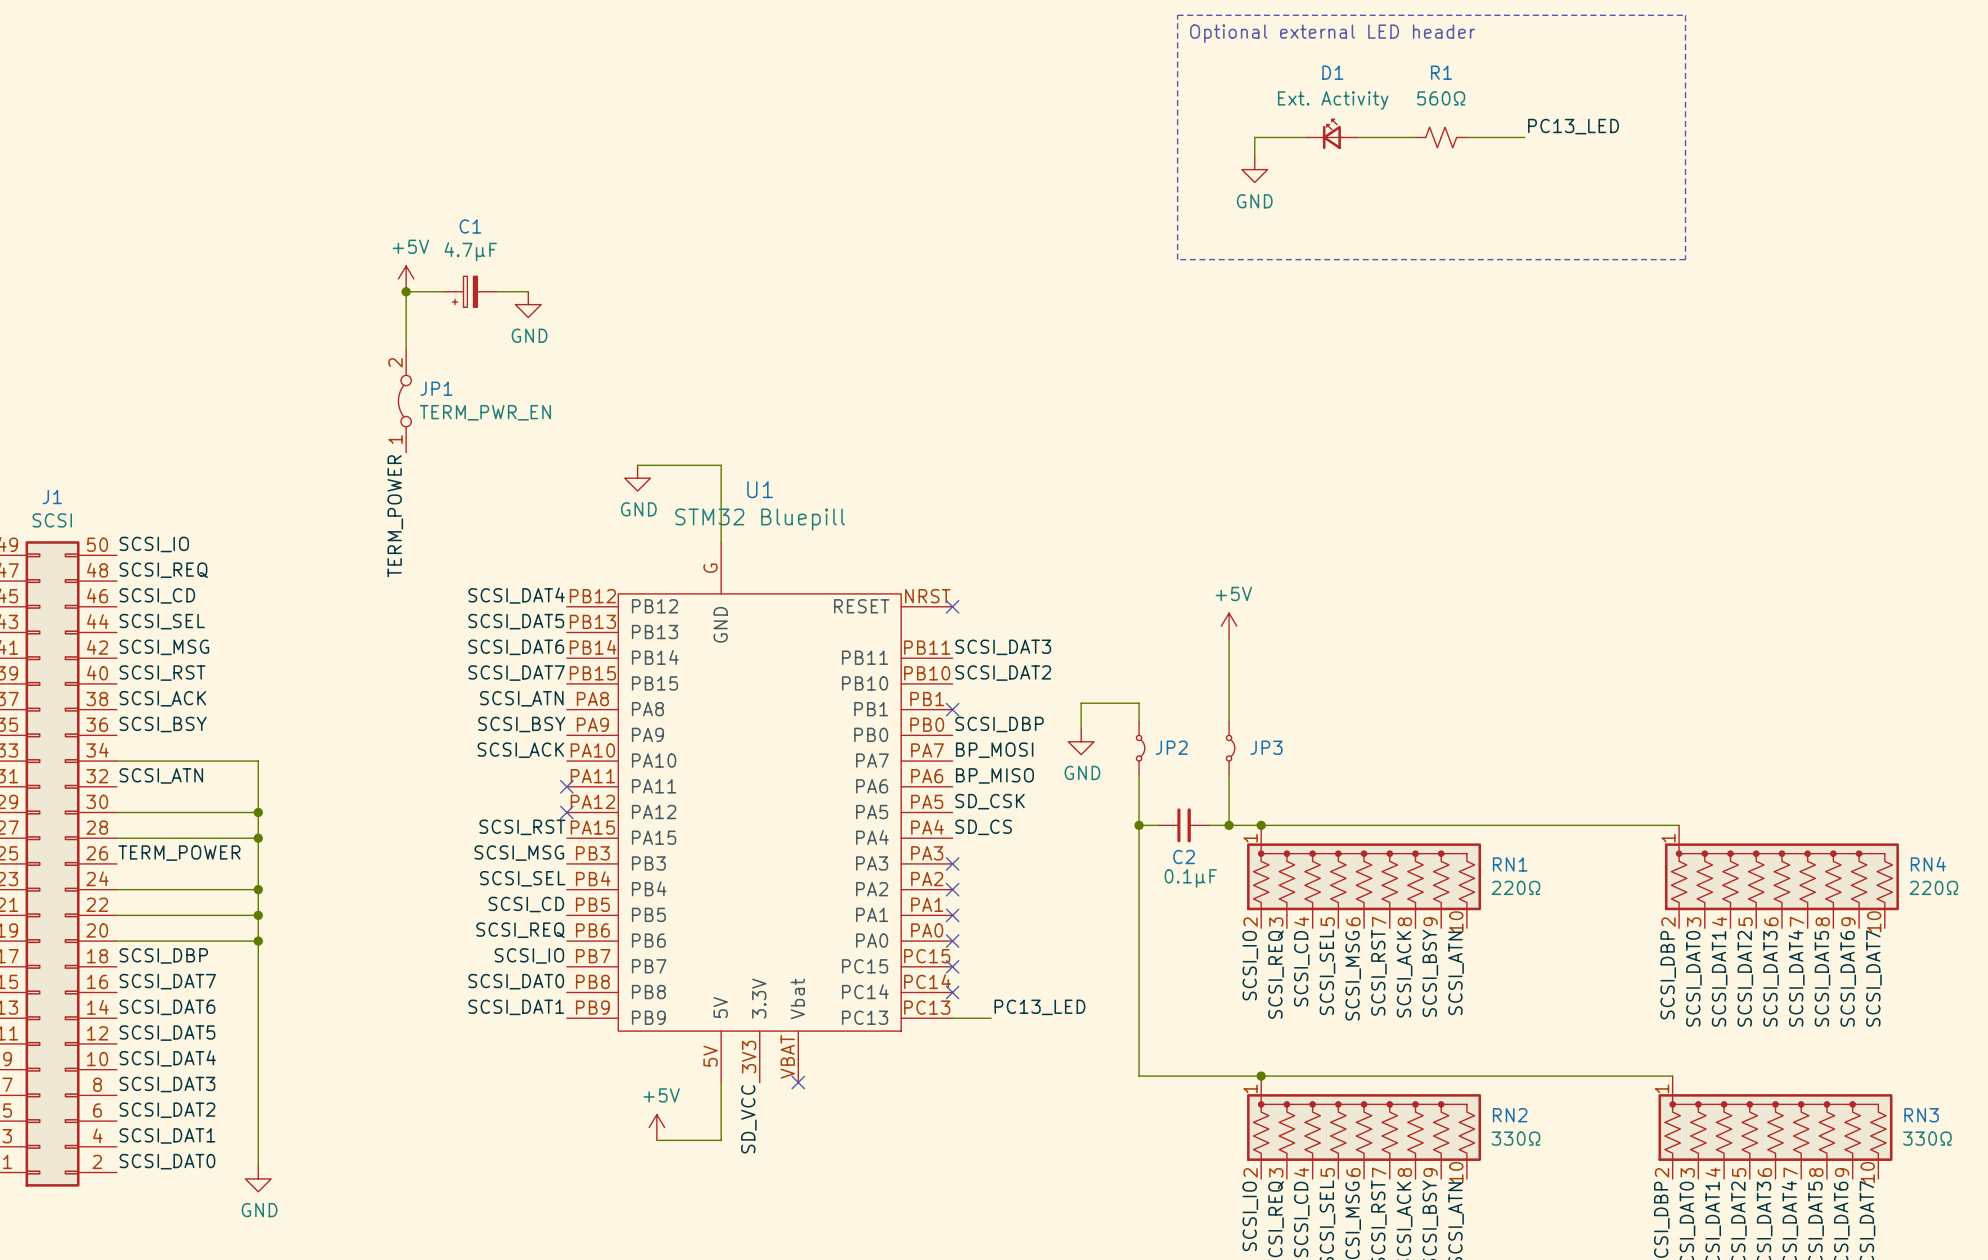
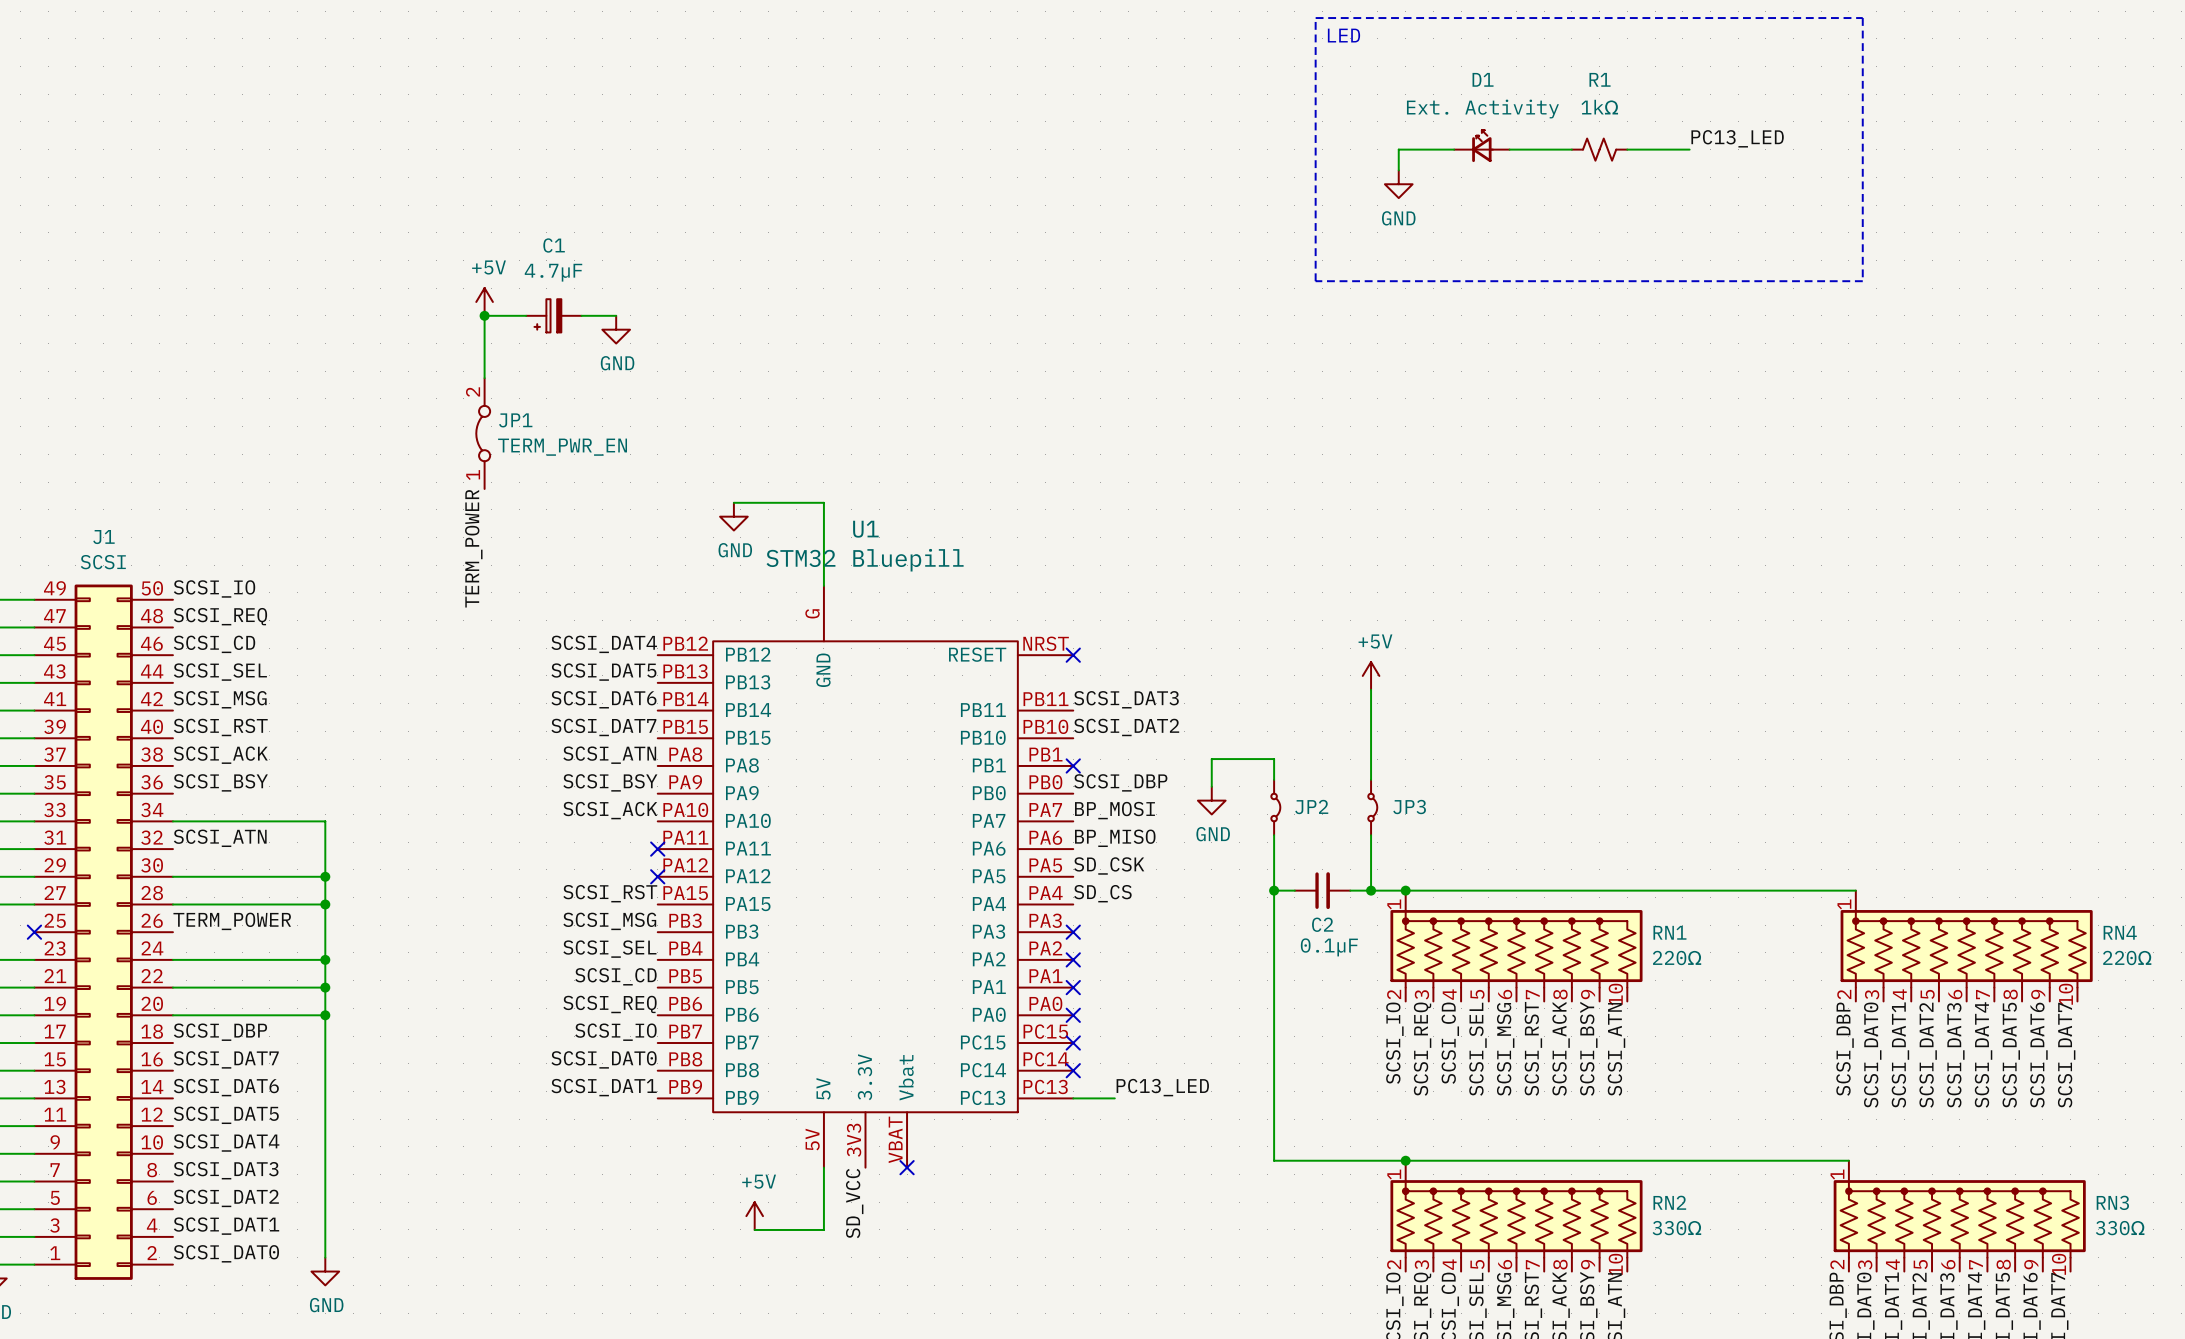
text: none -> LED (1343, 35)
text: Optional external LED header (1332, 33) -> none
R1 value: 560Ω (1441, 98) -> 1kΩ (1599, 107)

